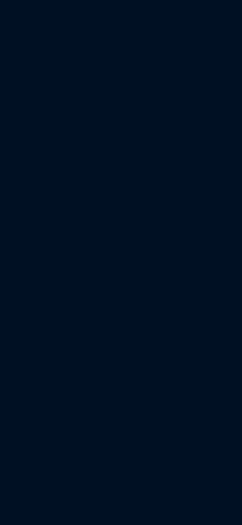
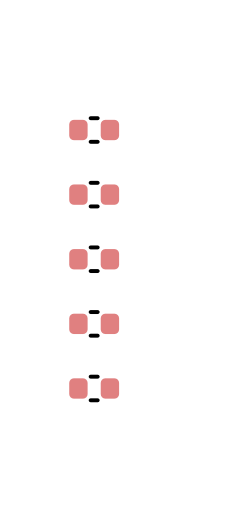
part: none -> (94, 130)
part: none -> (94, 194)
part: none -> (94, 259)
part: none -> (94, 323)
part: none -> (94, 388)

